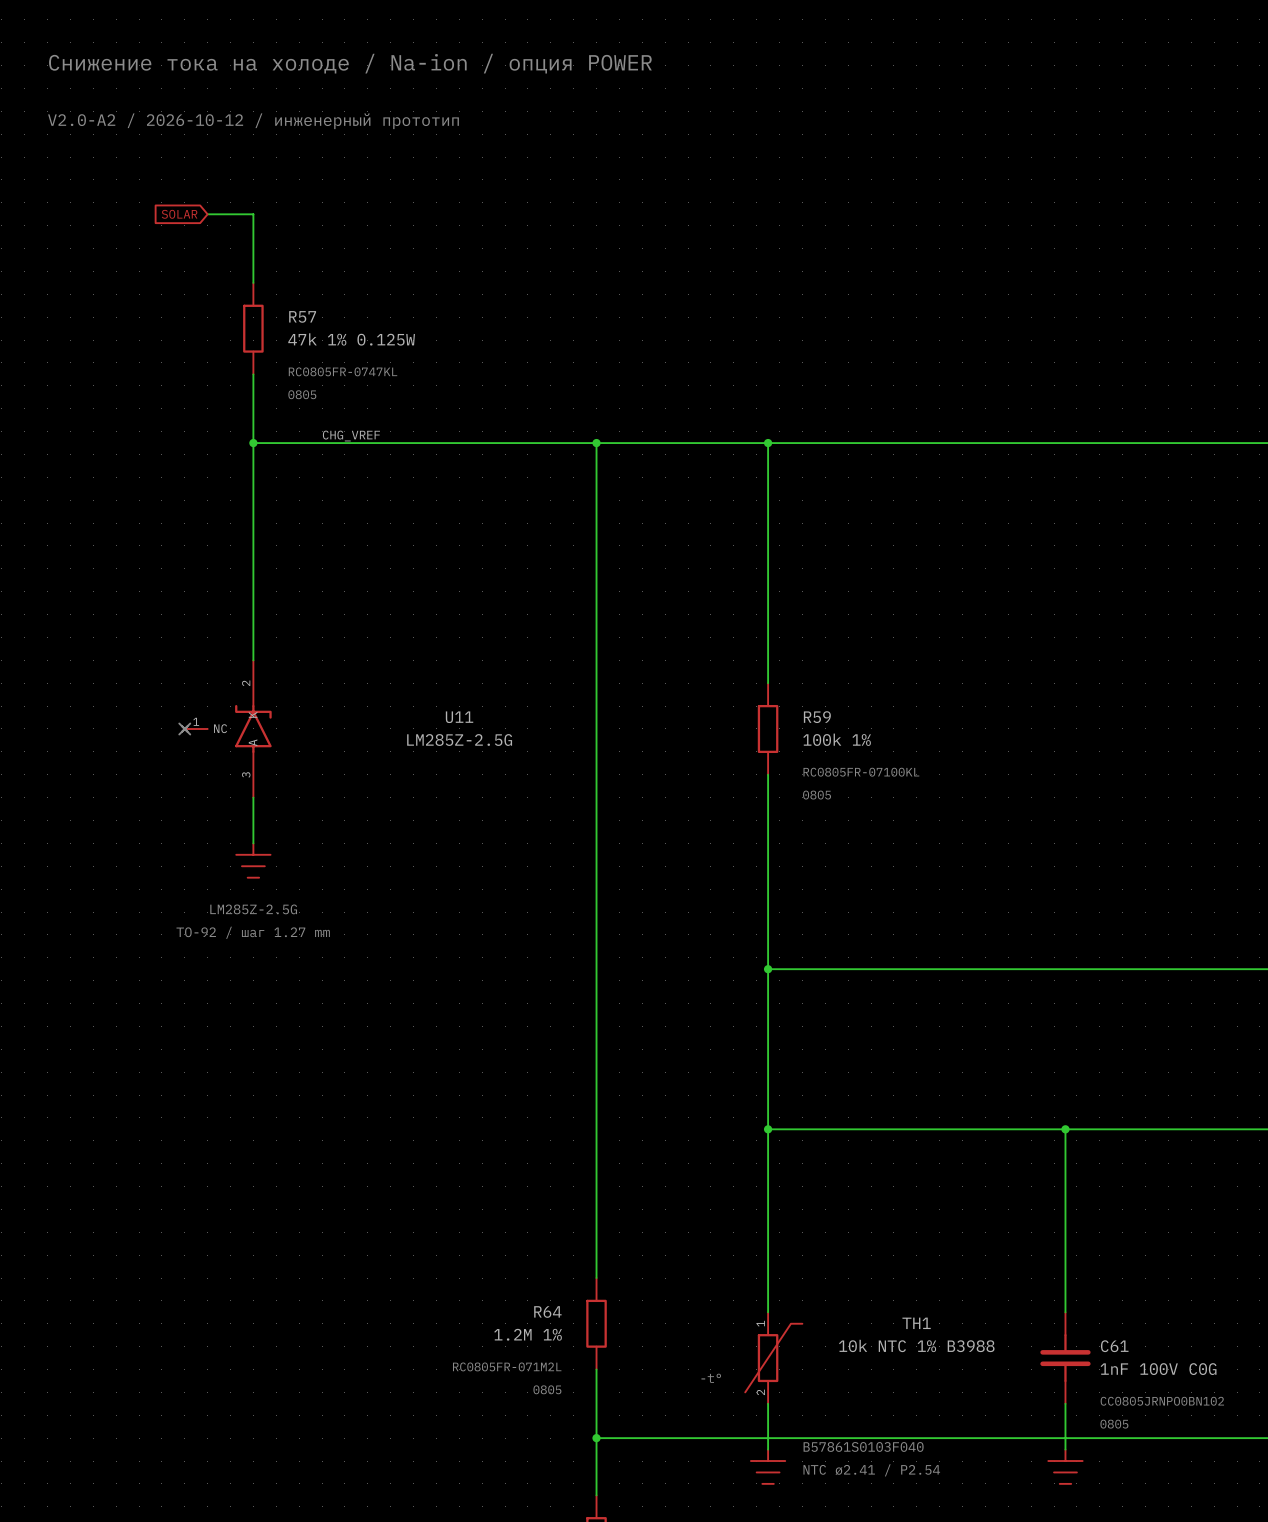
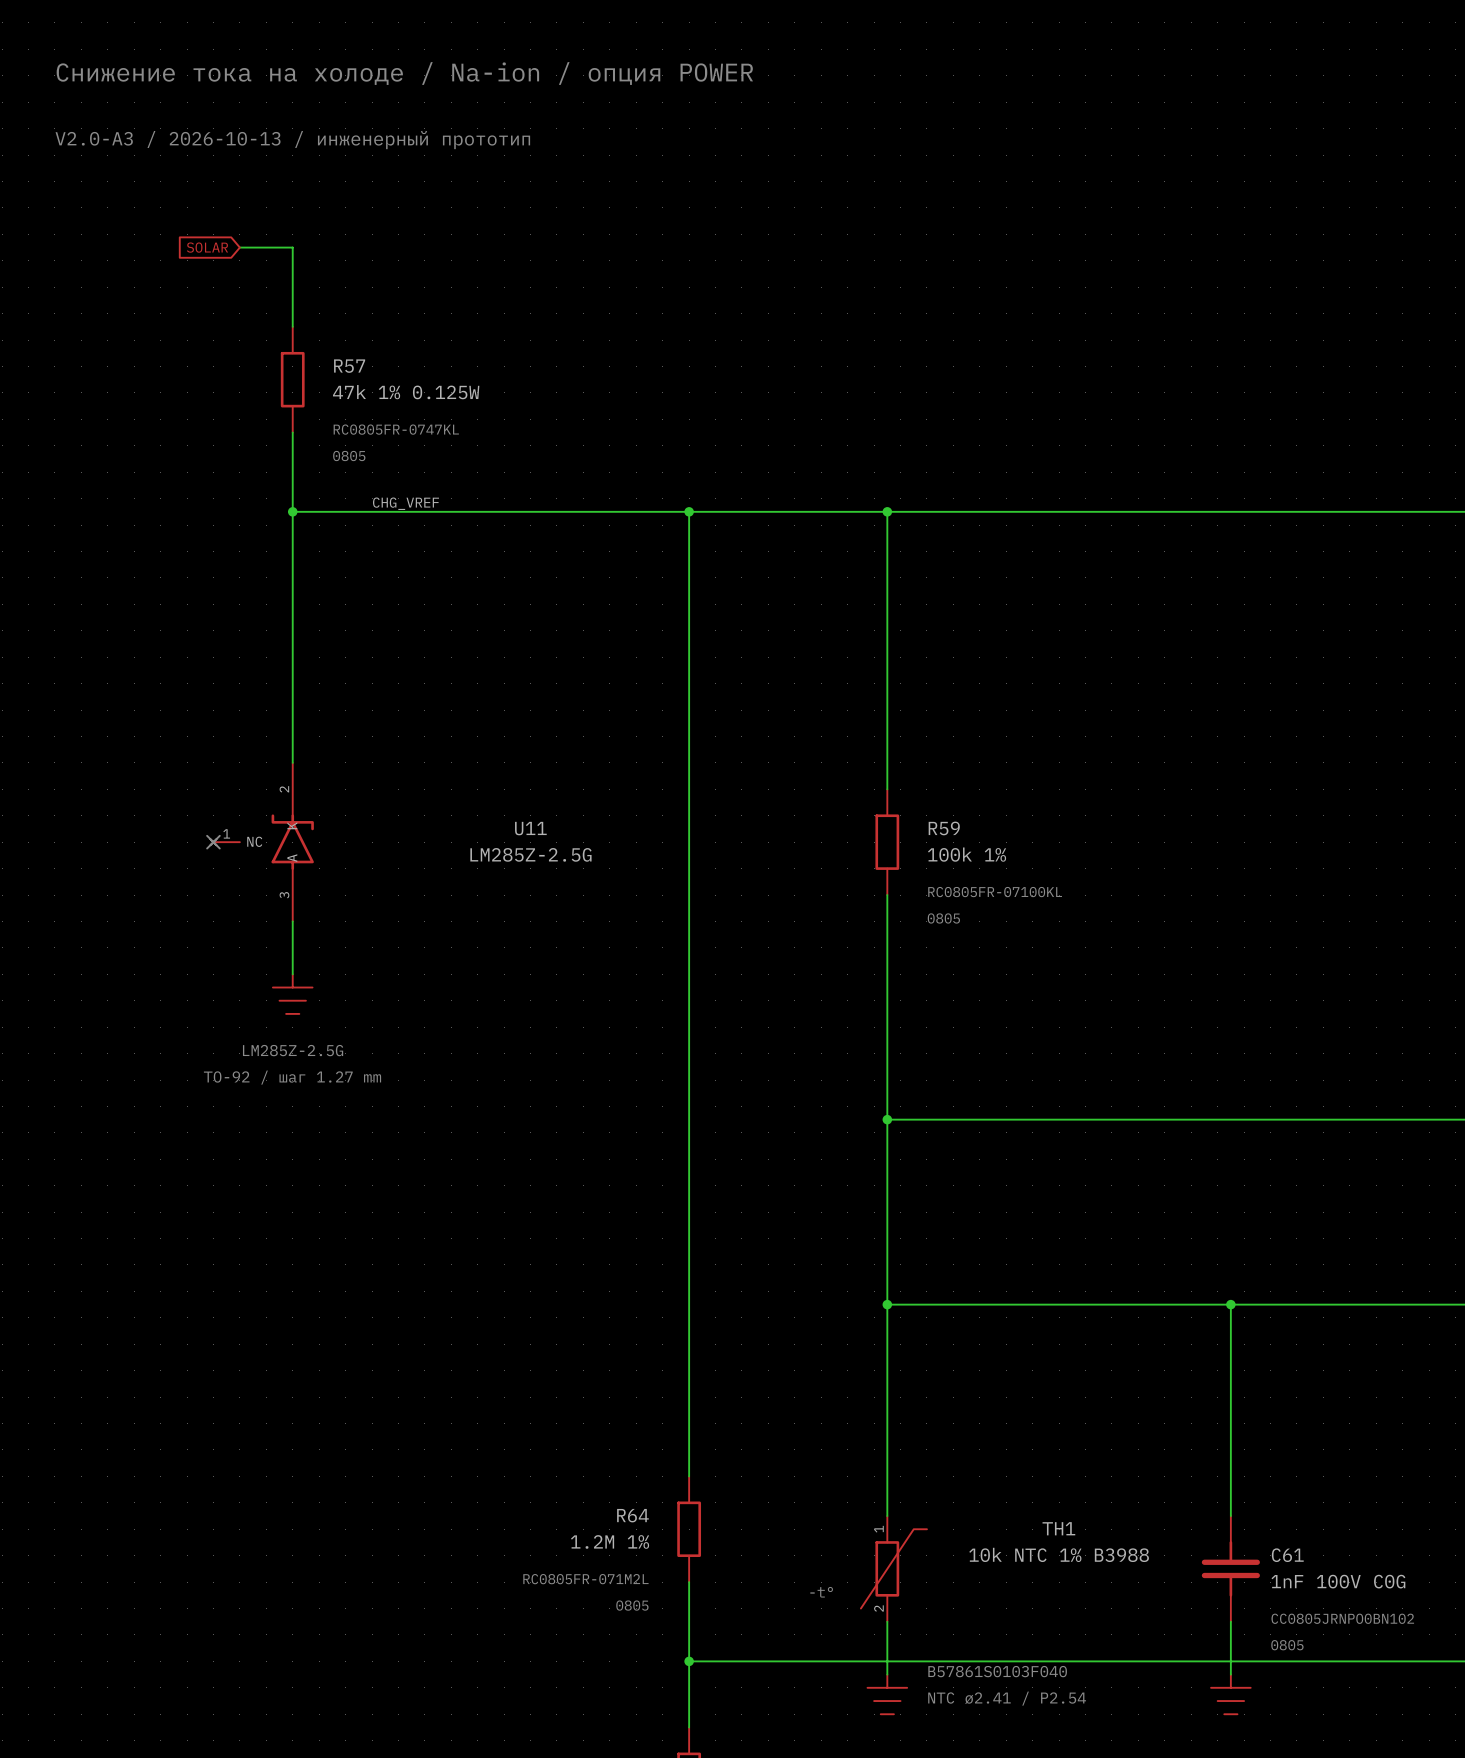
text: V2.0-A2 / 2026-10-12 / инженерный прототип (253, 121) -> V2.0-A3 / 2026-10-13 / инженерный прототип (292, 140)

